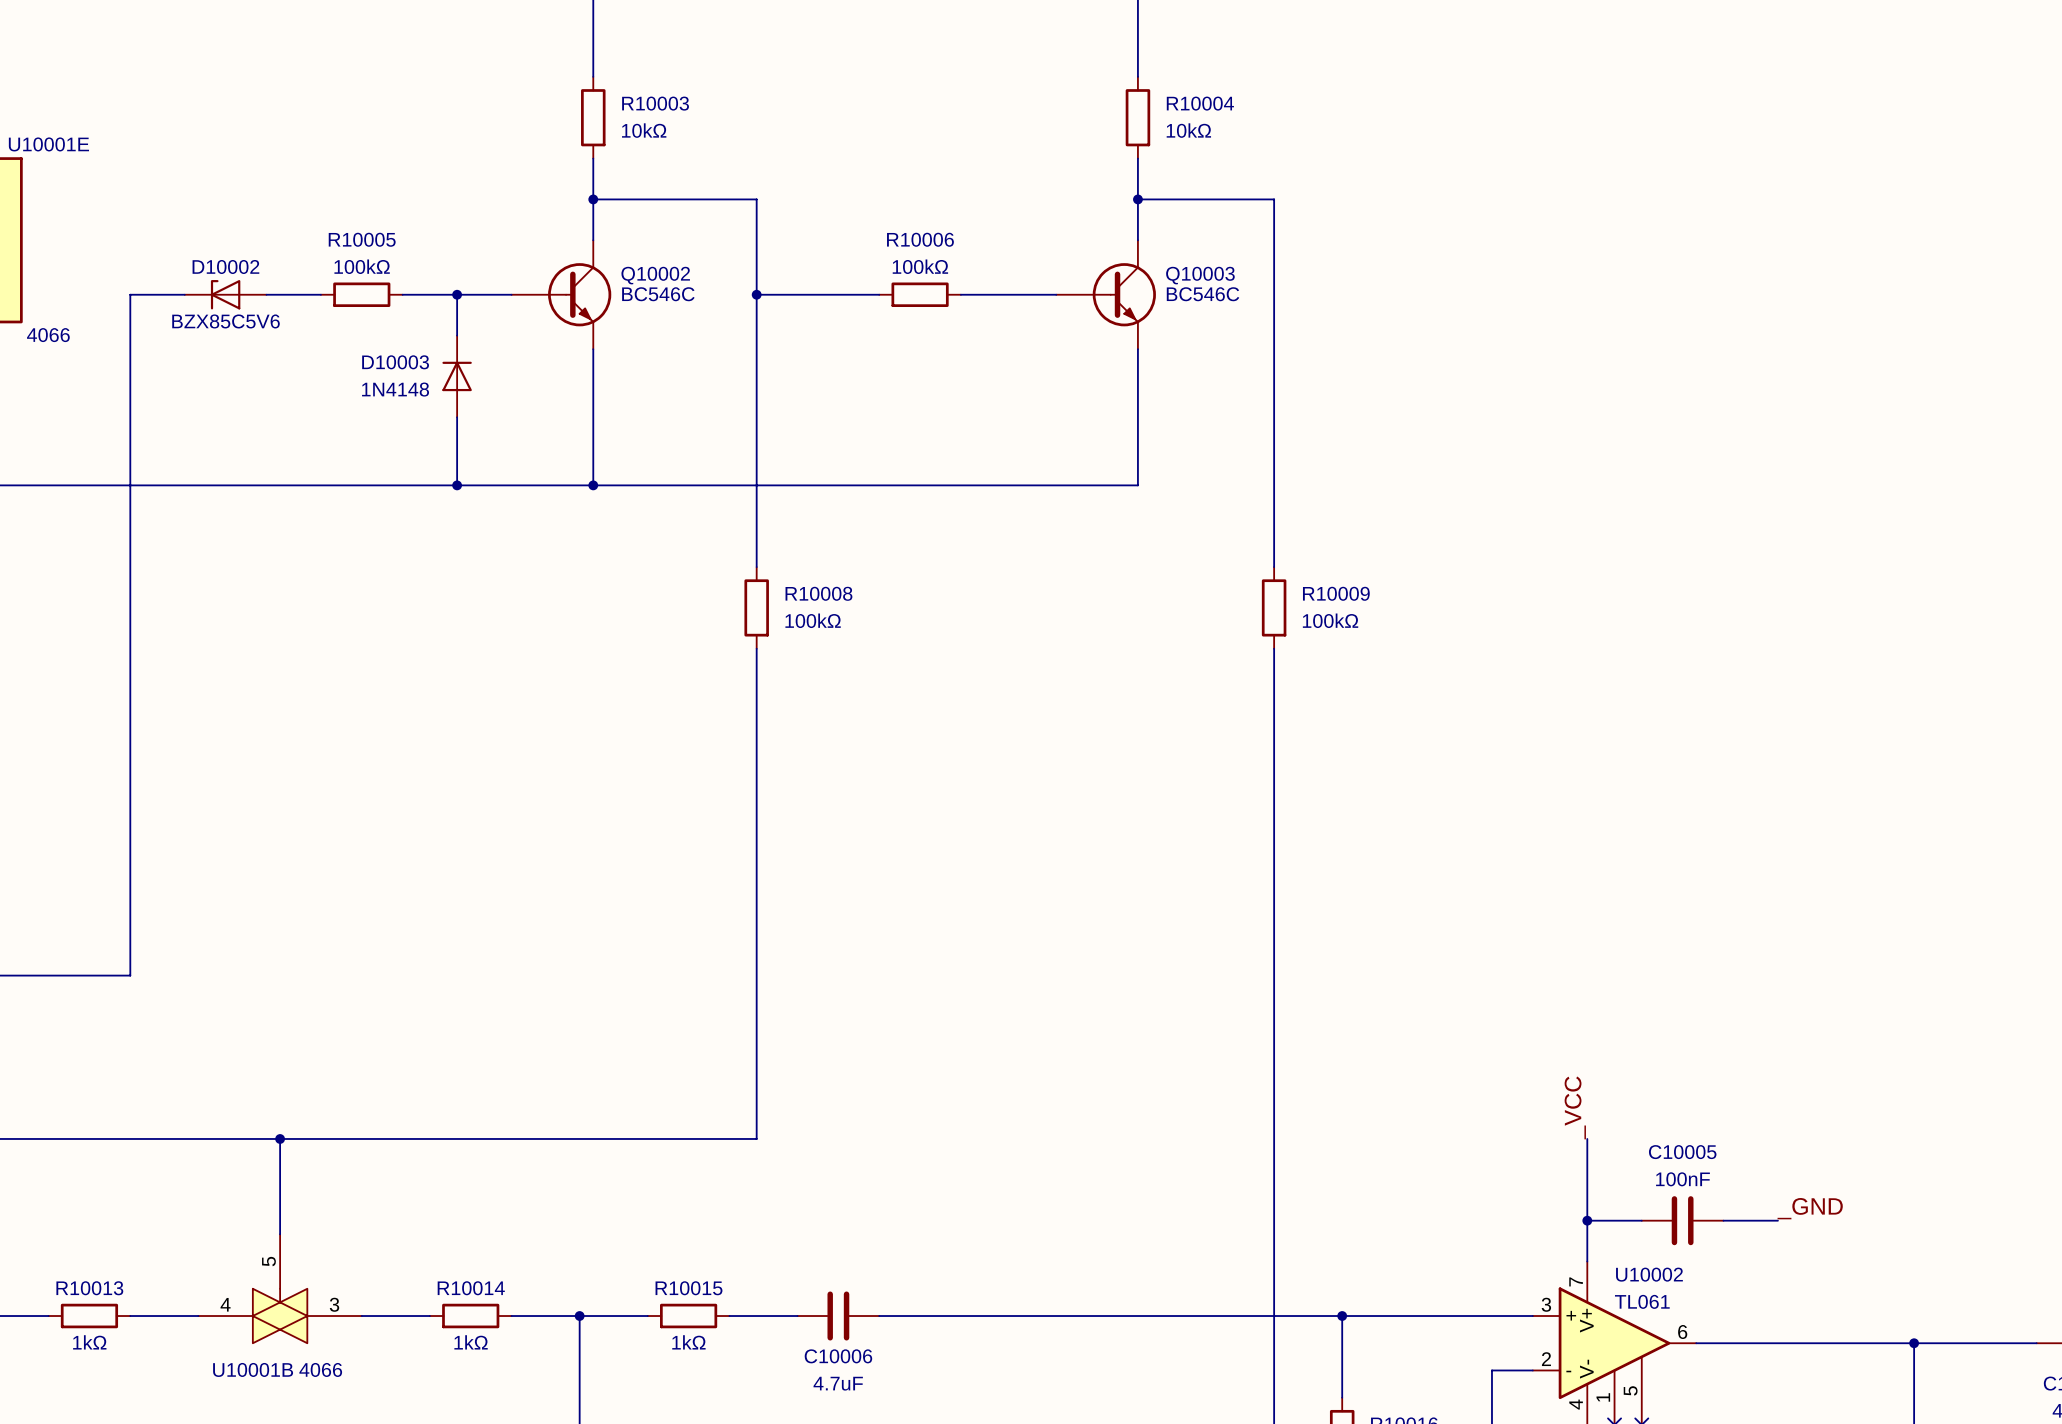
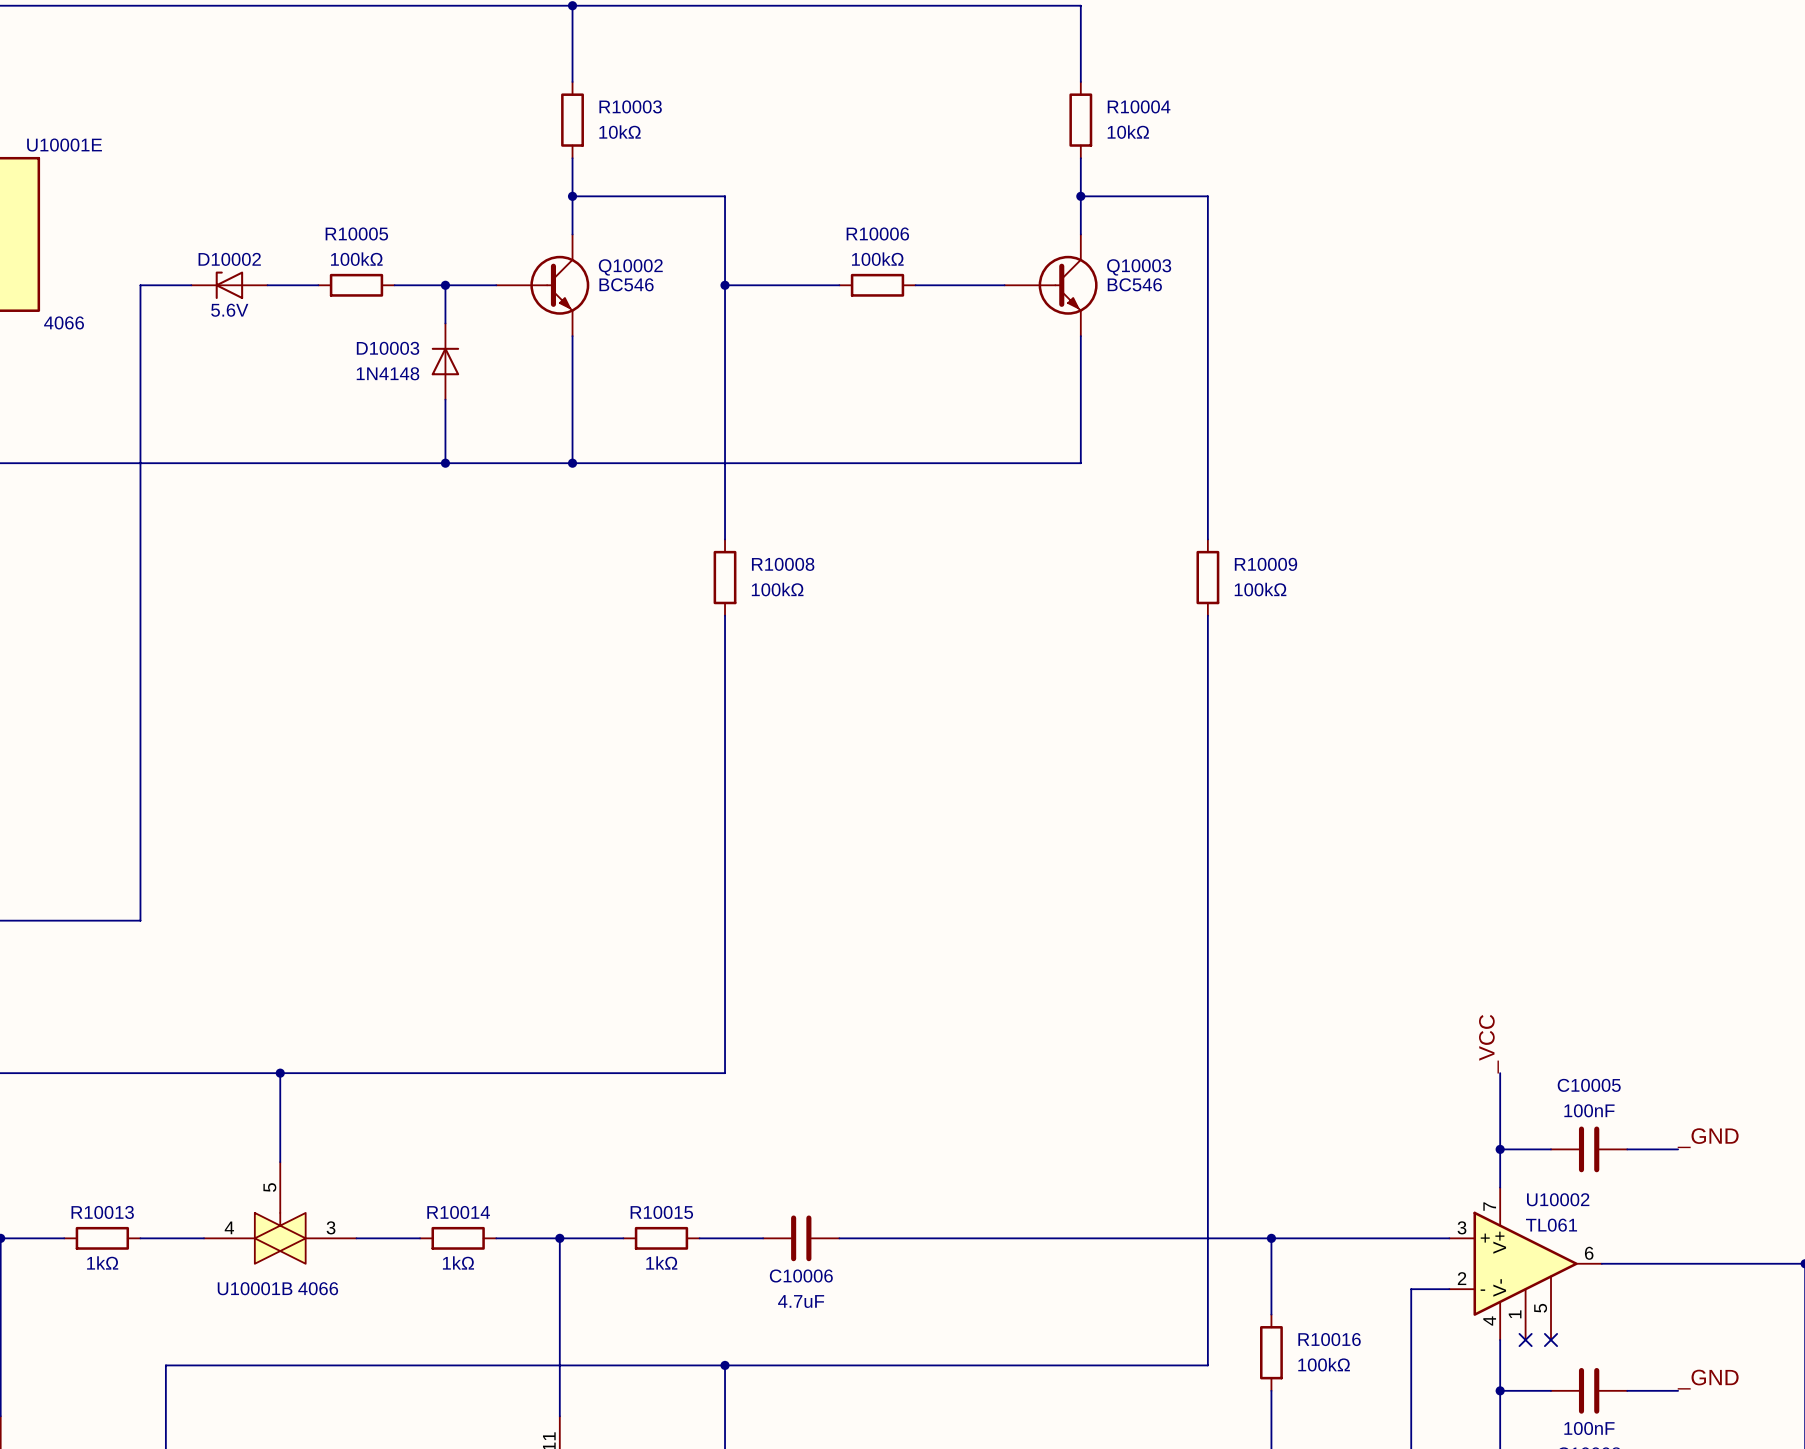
Q10002 value: BC546C (658, 294) -> BC546 (626, 284)
Q10003 value: BC546C (1203, 294) -> BC546 (1134, 284)
D10002 value: BZX85C5V6 (226, 321) -> 5.6V (229, 310)

